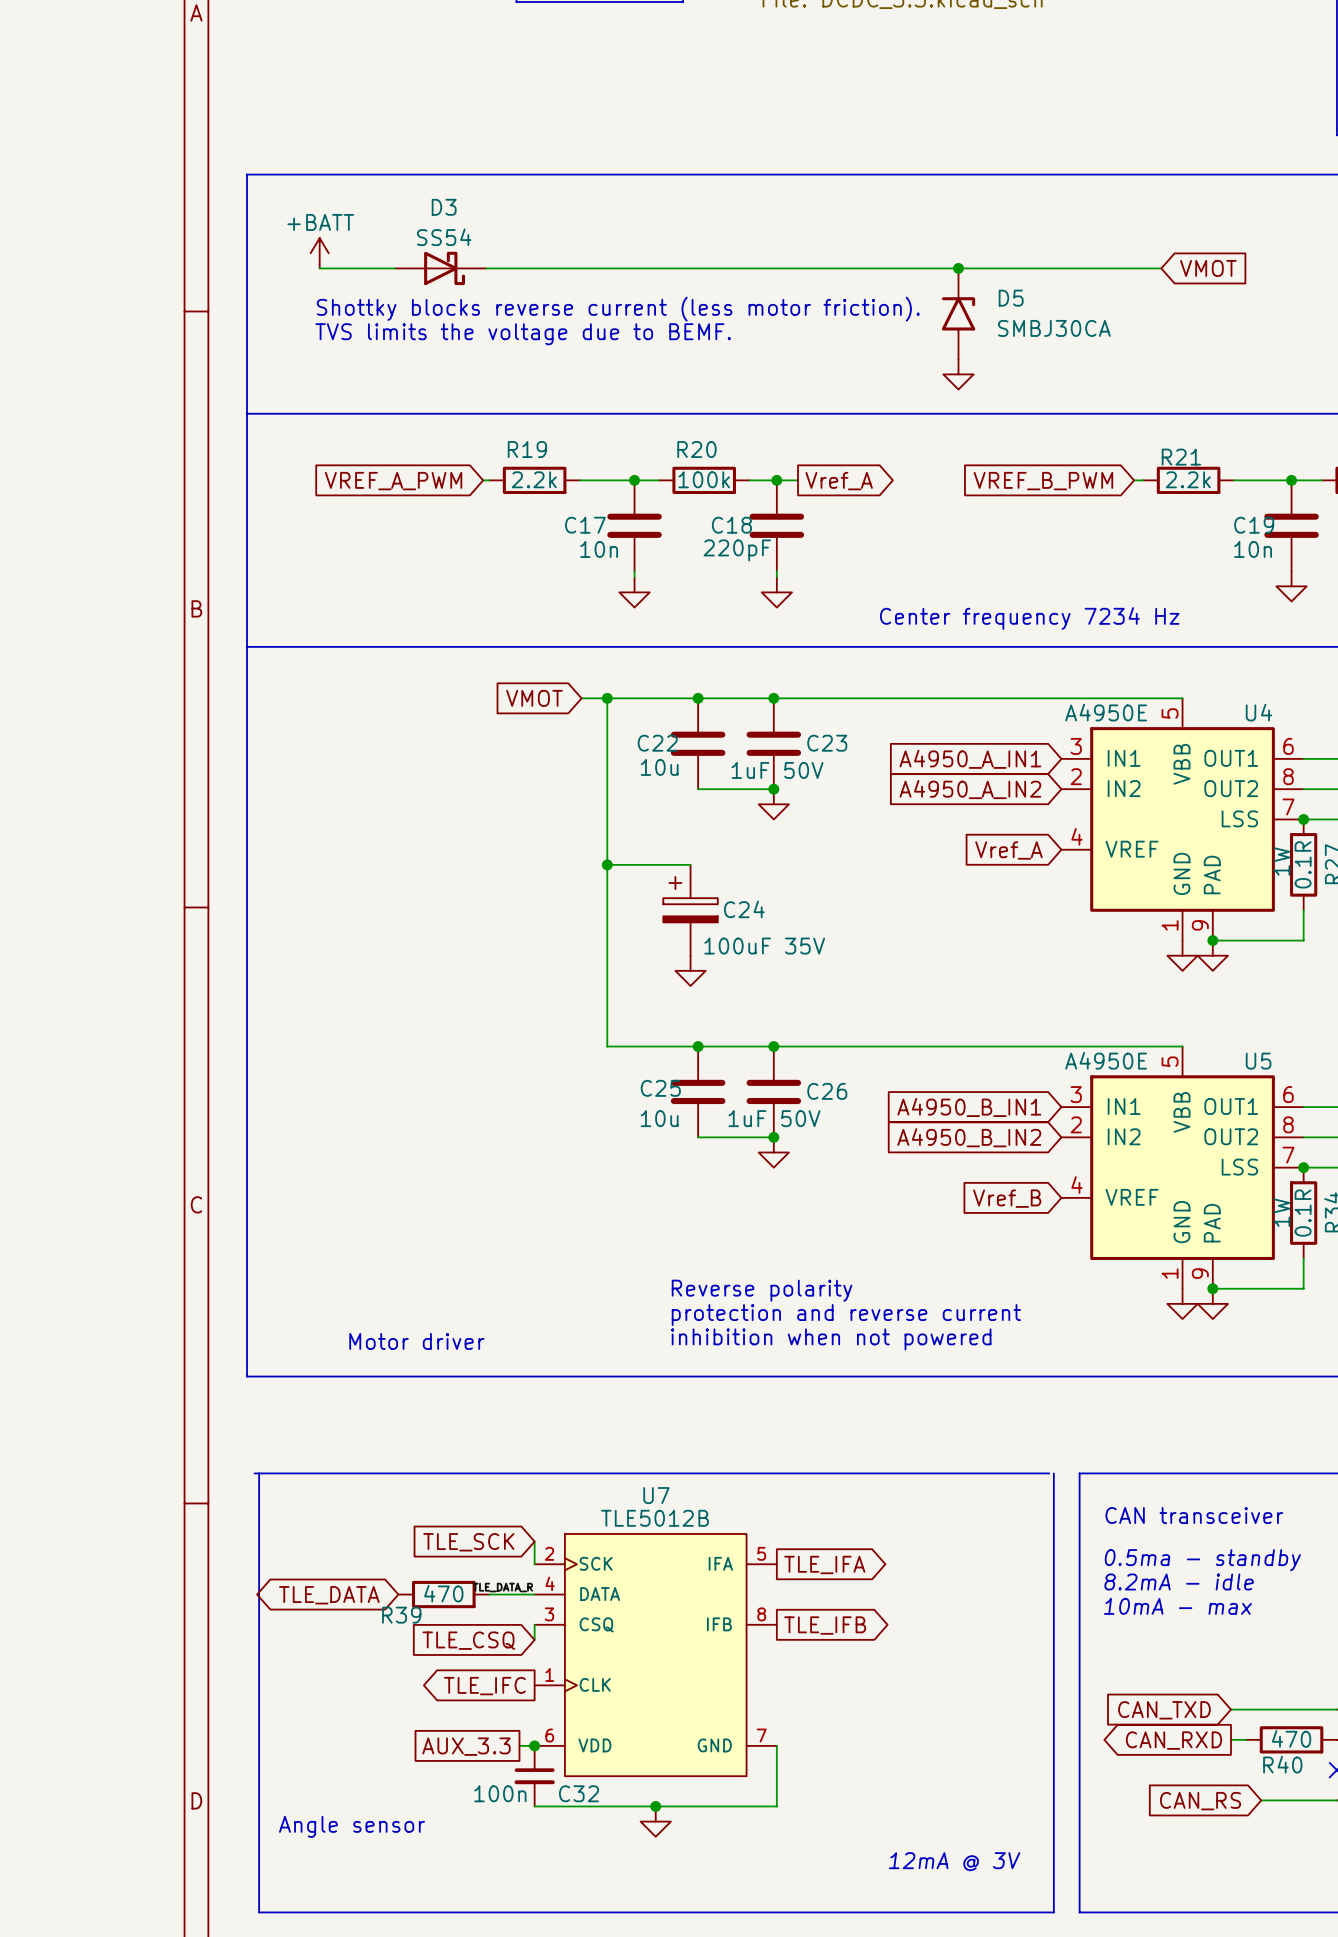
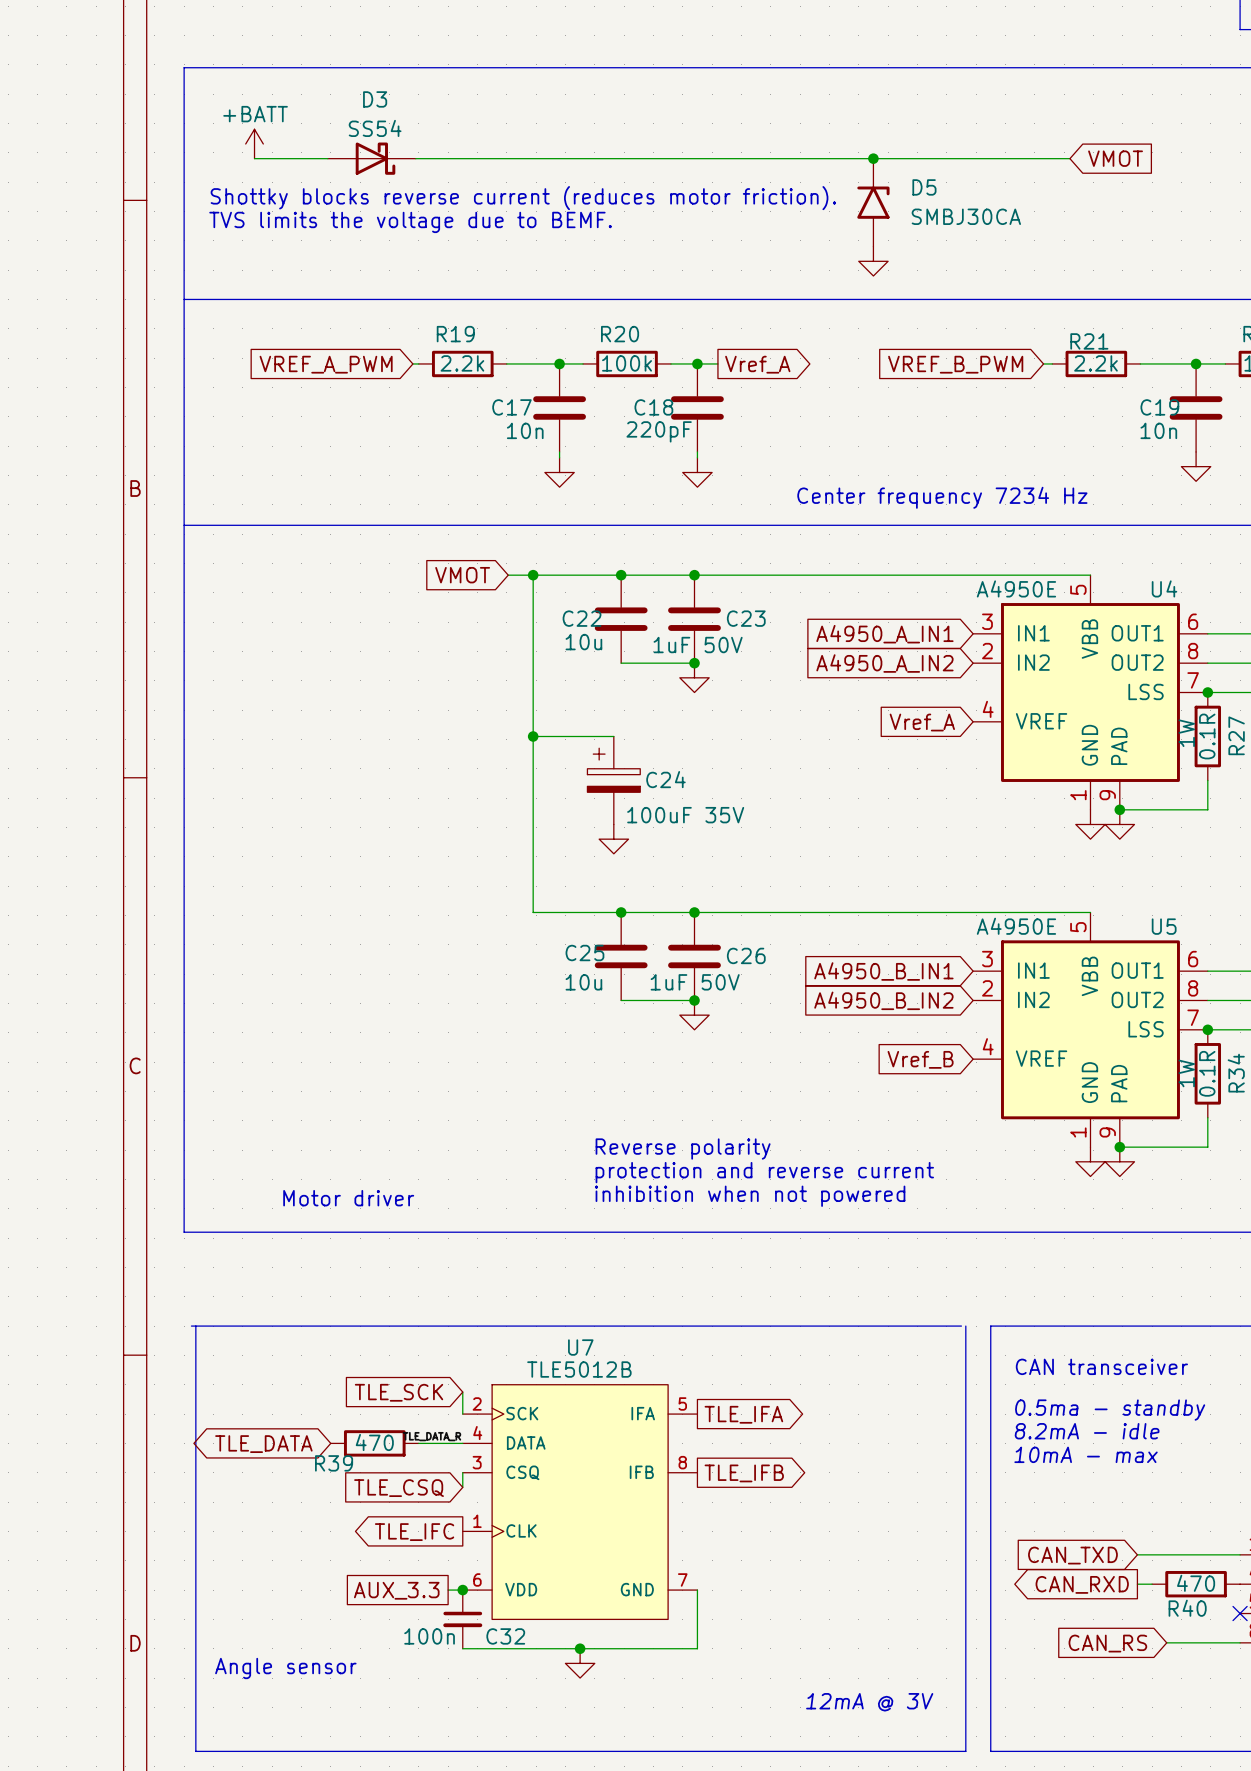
text: Shottky blocks reverse current (less motor friction). (618, 309) -> Shottky blocks reverse current (reduces motor friction). (523, 198)
text position: TVS limits the voltage due to BEMF. (523, 334) -> TVS limits the voltage due to BEMF. (410, 222)

